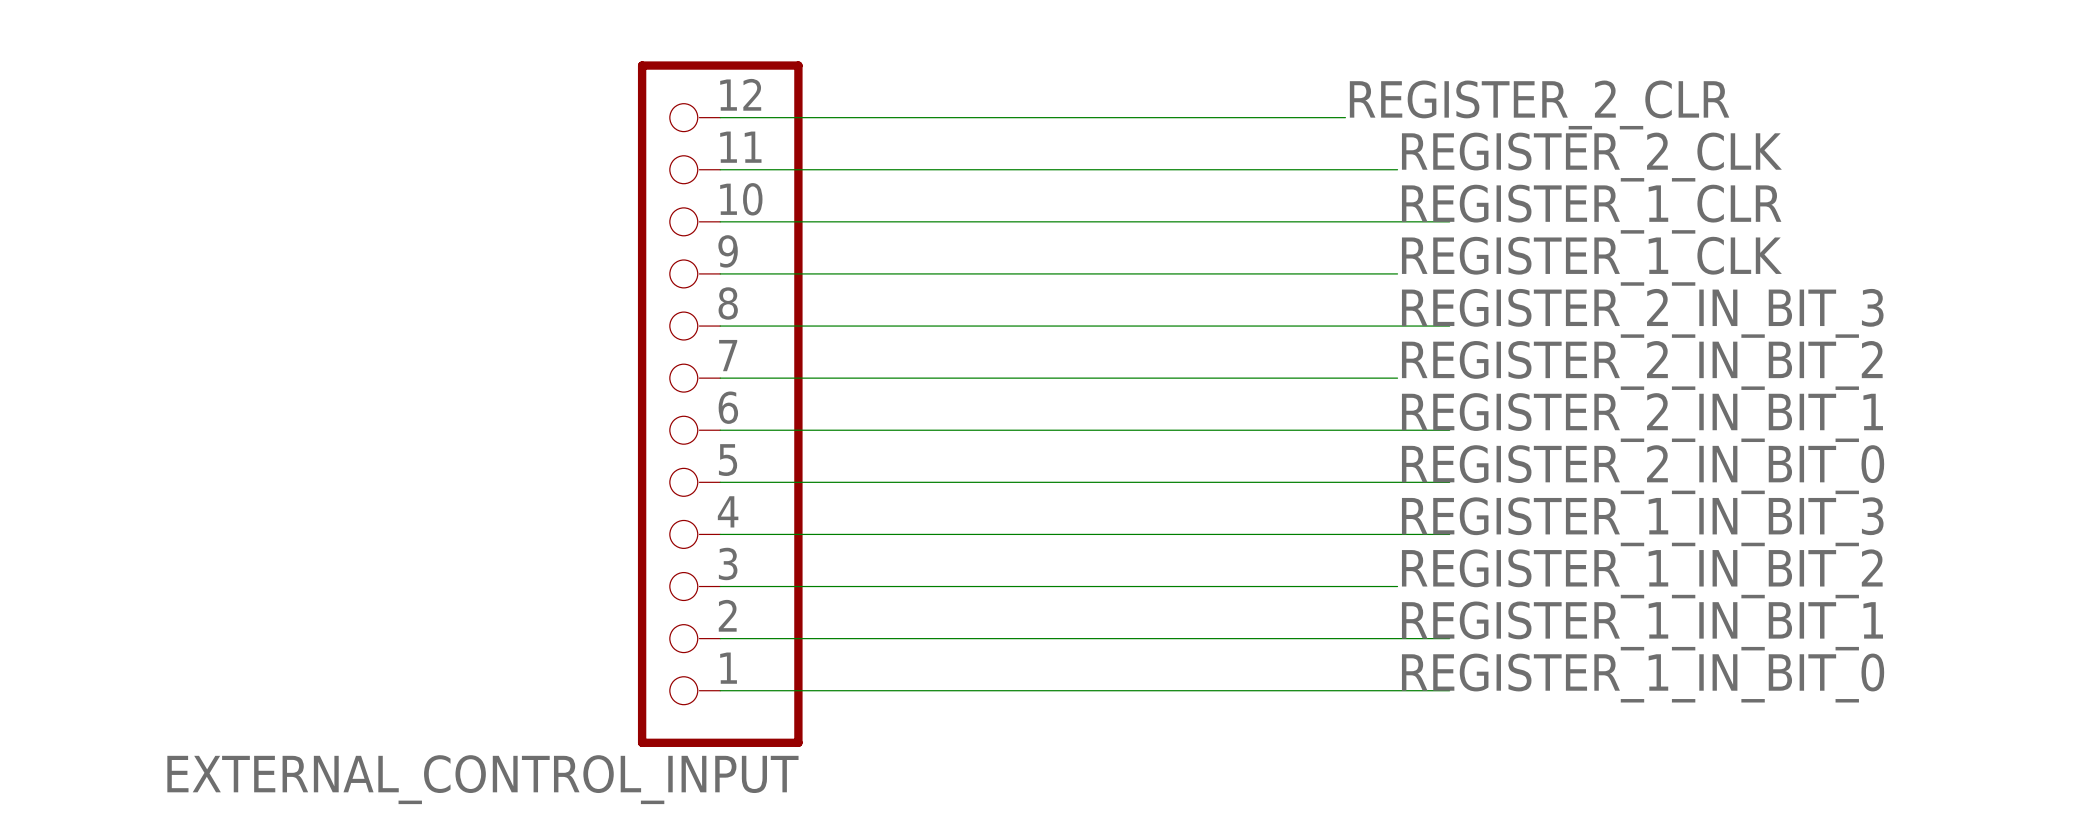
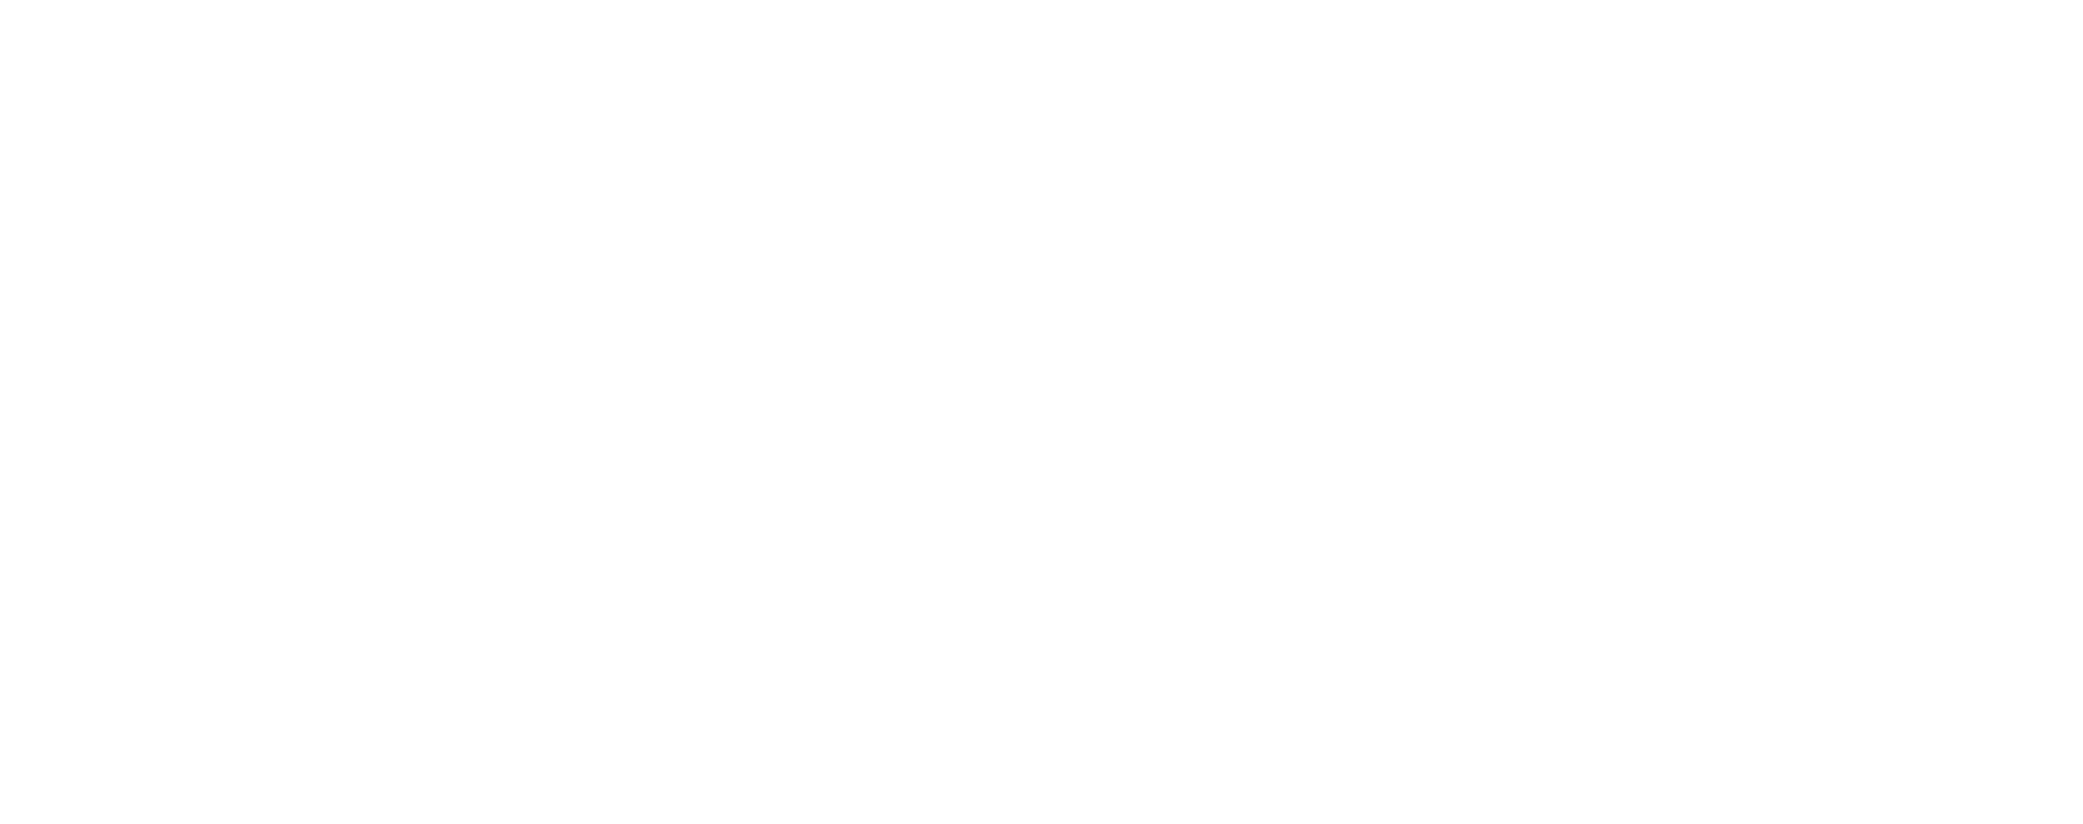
label: REGISTER_2_CLR (1539, 104) -> none
wire: (720, 117) (1345, 117) -> none
label: REGISTER_2_CLK (1591, 157) -> none
wire: (720, 169) (1397, 169) -> none
label: REGISTER_1_CLR (1591, 209) -> none
wire: (720, 221) (1449, 221) -> none
label: REGISTER_1_CLK (1591, 261) -> none
wire: (720, 273) (1397, 273) -> none
label: REGISTER_2_IN_BIT_3 (1642, 313) -> none
wire: (720, 326) (1449, 326) -> none
label: REGISTER_2_IN_BIT_2 (1642, 365) -> none
wire: (720, 378) (1397, 378) -> none
EXTERNAL_CONTROL_INPUT: (720, 404) -> none
label: REGISTER_2_IN_BIT_1 (1642, 417) -> none
wire: (720, 430) (1449, 430) -> none
label: REGISTER_2_IN_BIT_0 (1643, 469) -> none
wire: (720, 482) (1449, 482) -> none
label: REGISTER_1_IN_BIT_3 (1642, 521) -> none
wire: (720, 534) (1449, 534) -> none
label: REGISTER_1_IN_BIT_2 (1642, 573) -> none
wire: (720, 586) (1397, 586) -> none
label: REGISTER_1_IN_BIT_1 (1642, 625) -> none
wire: (720, 638) (1449, 638) -> none
label: REGISTER_1_IN_BIT_0 (1643, 678) -> none
wire: (720, 690) (1449, 690) -> none

